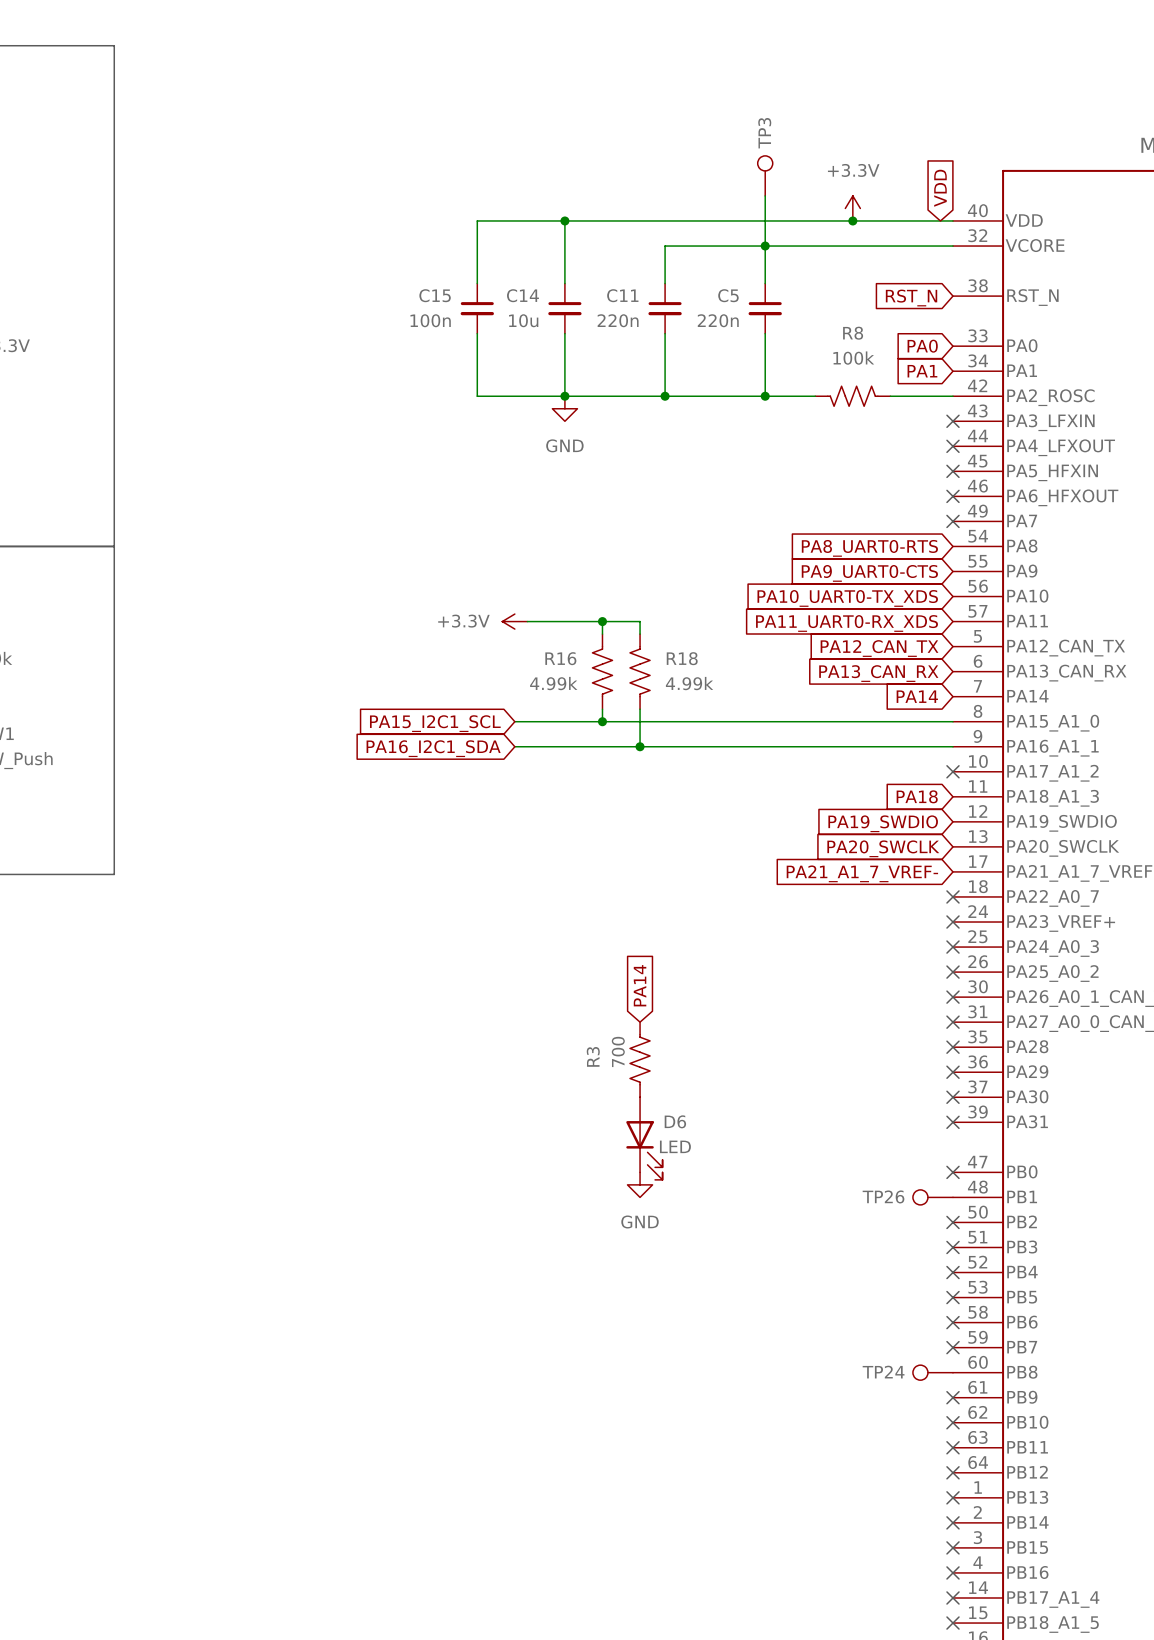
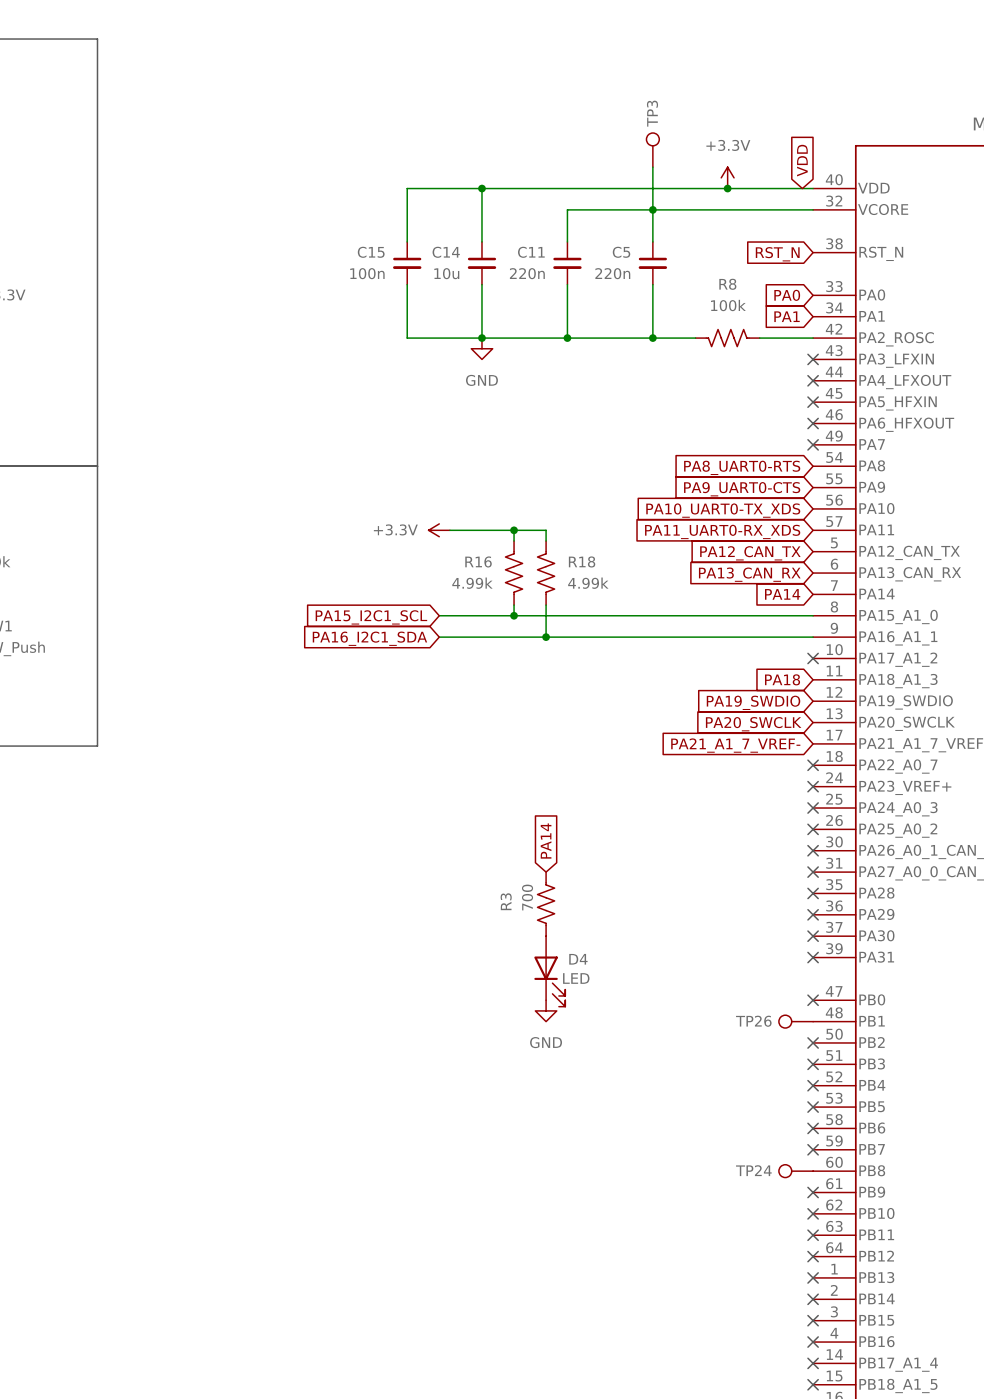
D6 name: D6 (675, 1121) -> D4 (578, 959)

